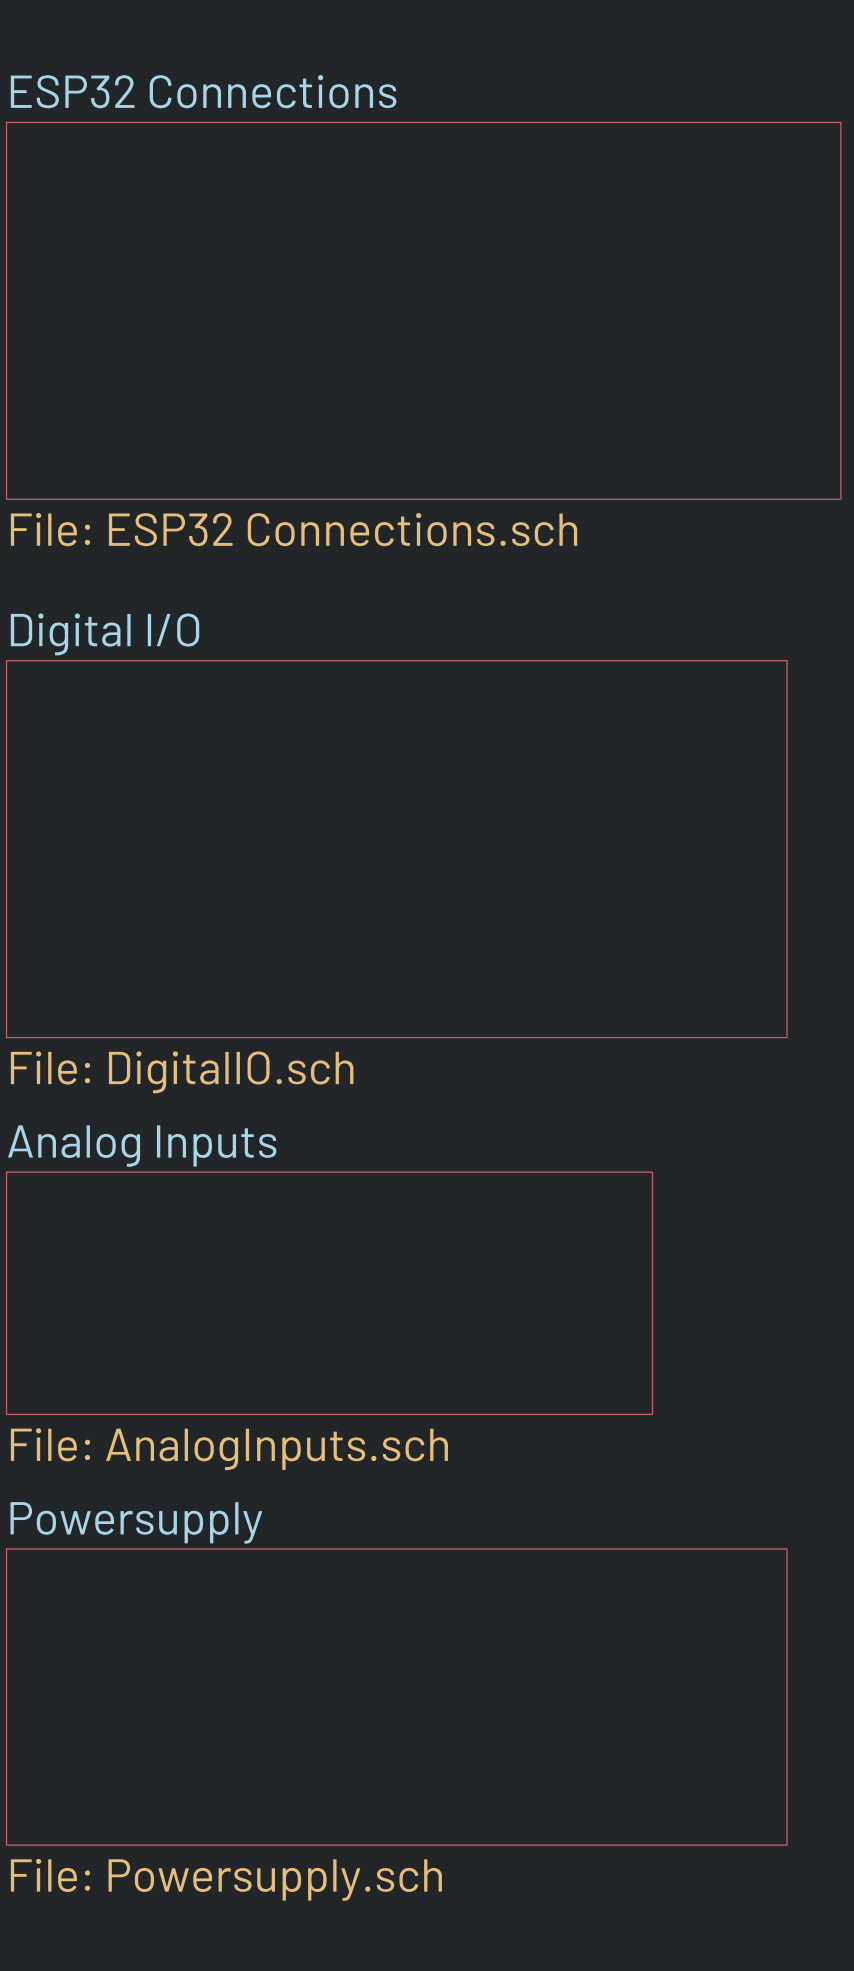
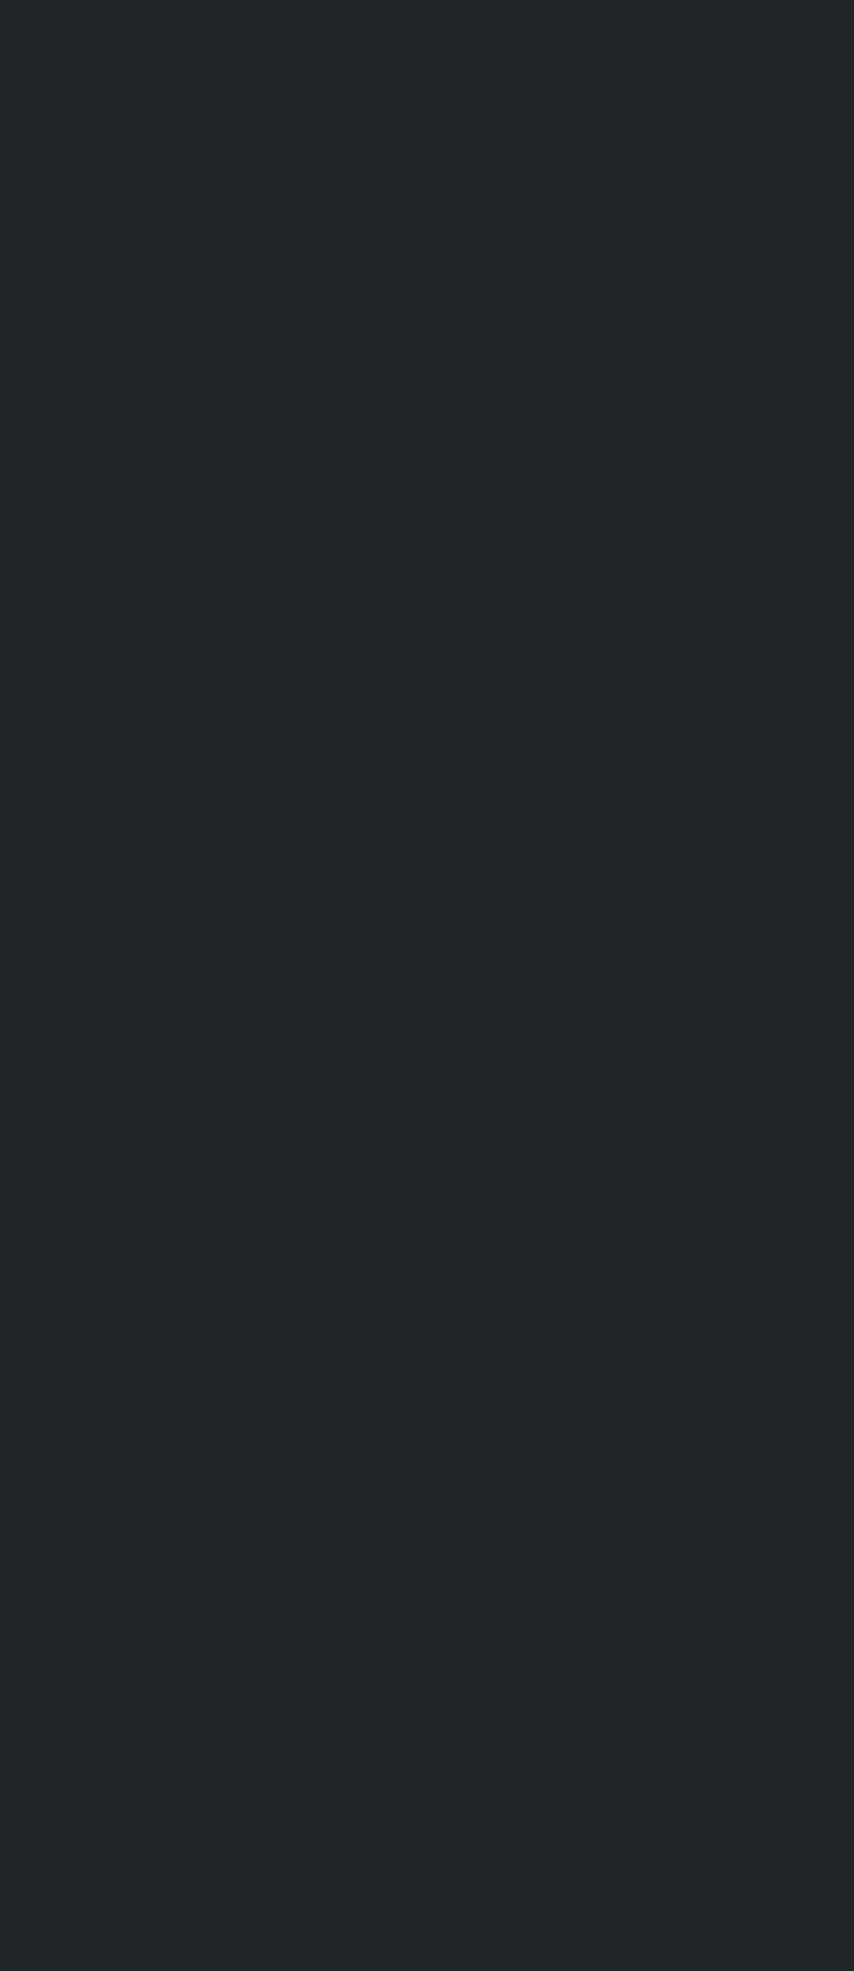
sheet ESP32 Connections: File: ESP32 Connections.sch (423, 310) -> none
sheet Digital I/O: File: DigitalIO.sch (396, 849) -> none
sheet Analog Inputs: File: AnalogInputs.sch (329, 1293) -> none
sheet Powersupply: File: Powersupply.sch (396, 1697) -> none

